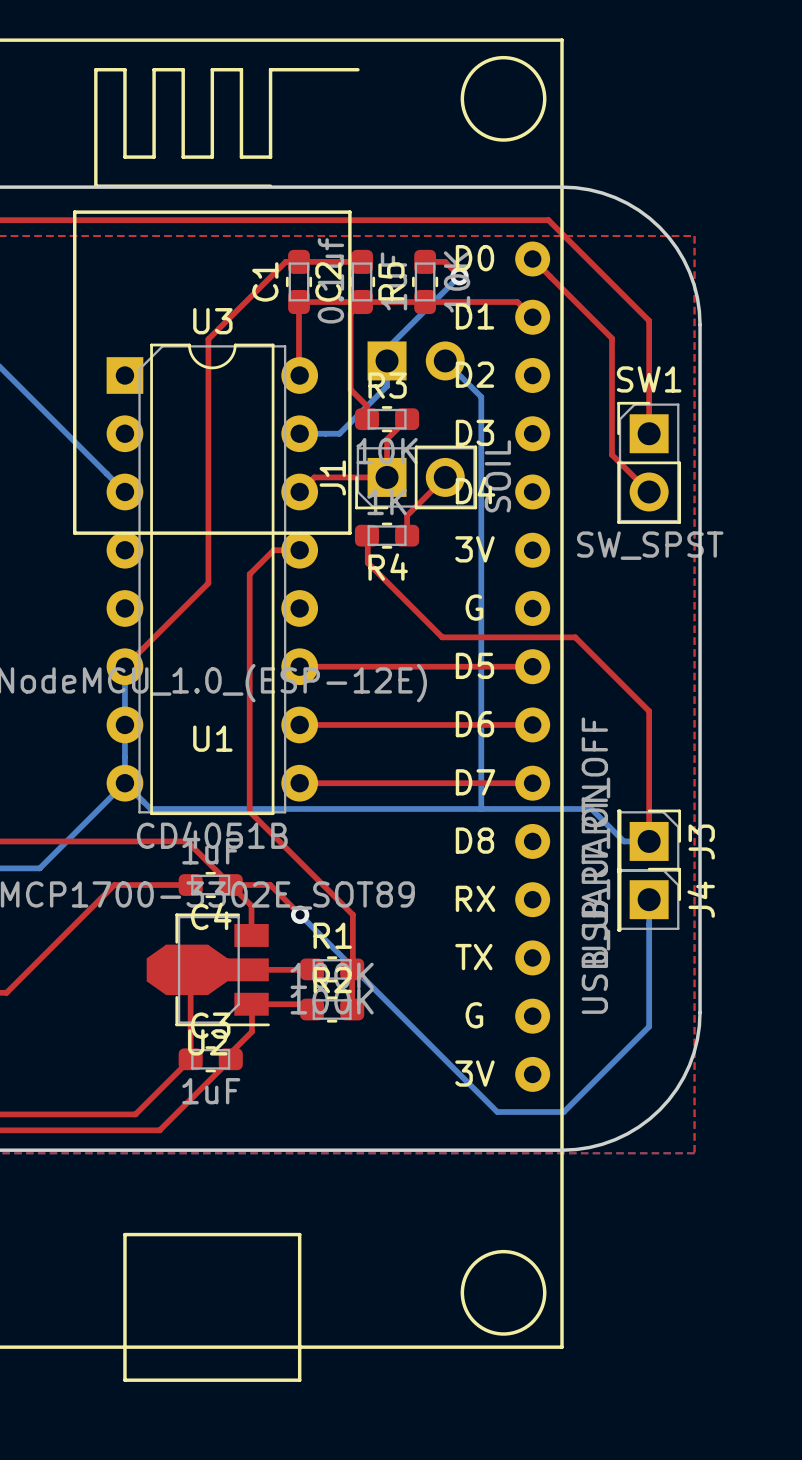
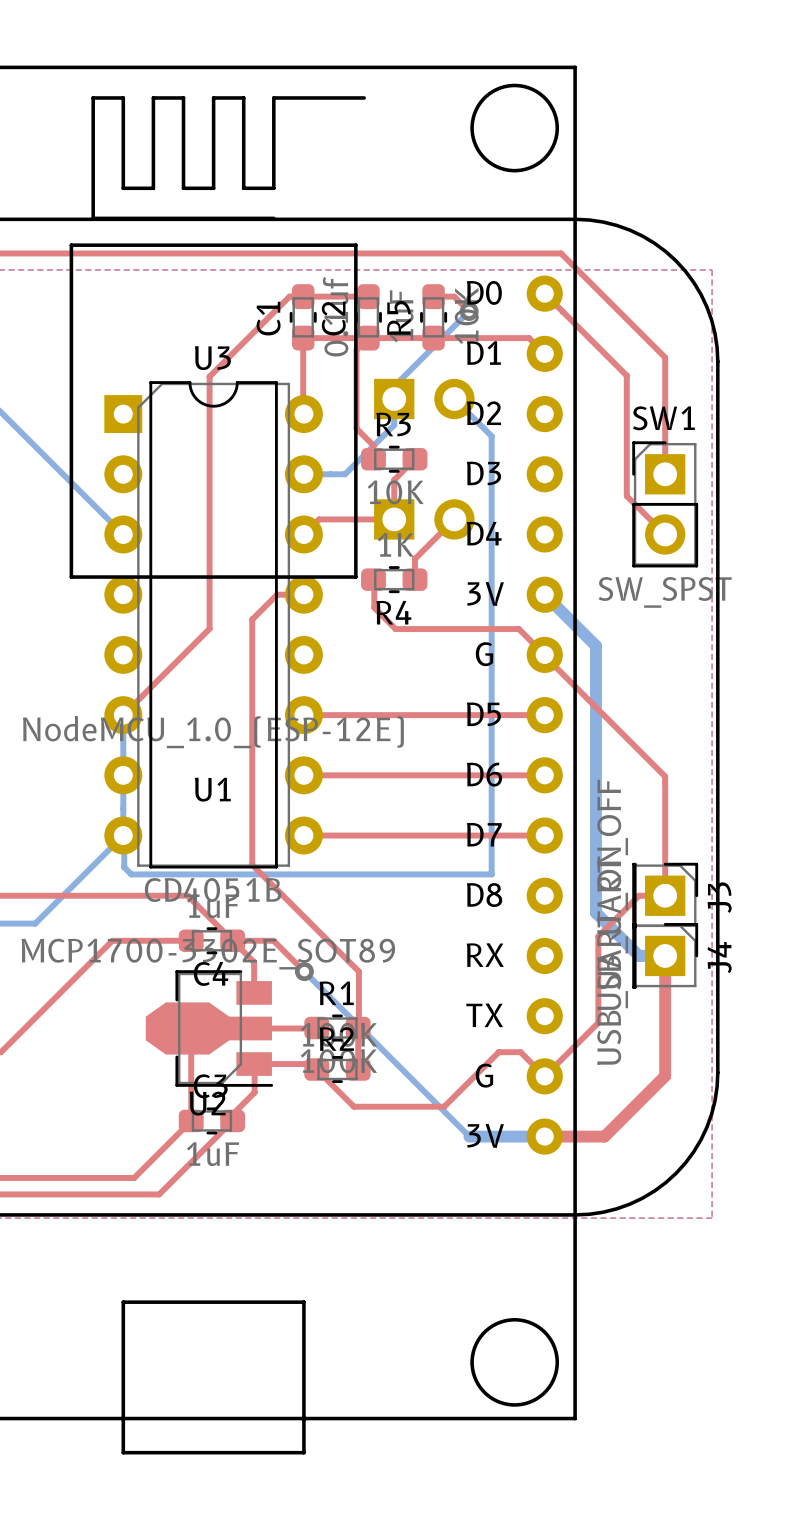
J1 side: top (416, 477) -> bottom (424, 519)
bottom track: none -> (544, 594) (595, 645) (595, 912) (639, 955) (665, 955)
top track: (388, 583) (442, 637) (575, 637) (649, 711) (649, 726) -> (395, 629) (518, 629) (665, 776)
bottom track: (125, 784) (150, 808) (591, 808) (623, 841) (649, 841) -> (124, 836) (124, 867) (131, 874) (491, 874) (491, 862)
top track: none -> (665, 895) (639, 895) (598, 936) (598, 1022) (544, 1076) (520, 1052) (498, 1052) (444, 1106) (353, 1106) (316, 1069)
top track: none -> (665, 955) (665, 1076) (604, 1136) (544, 1136)
bottom track: (649, 899) (649, 1026) (563, 1112) (497, 1112) (459, 1074) -> (544, 1136) (469, 1136)

